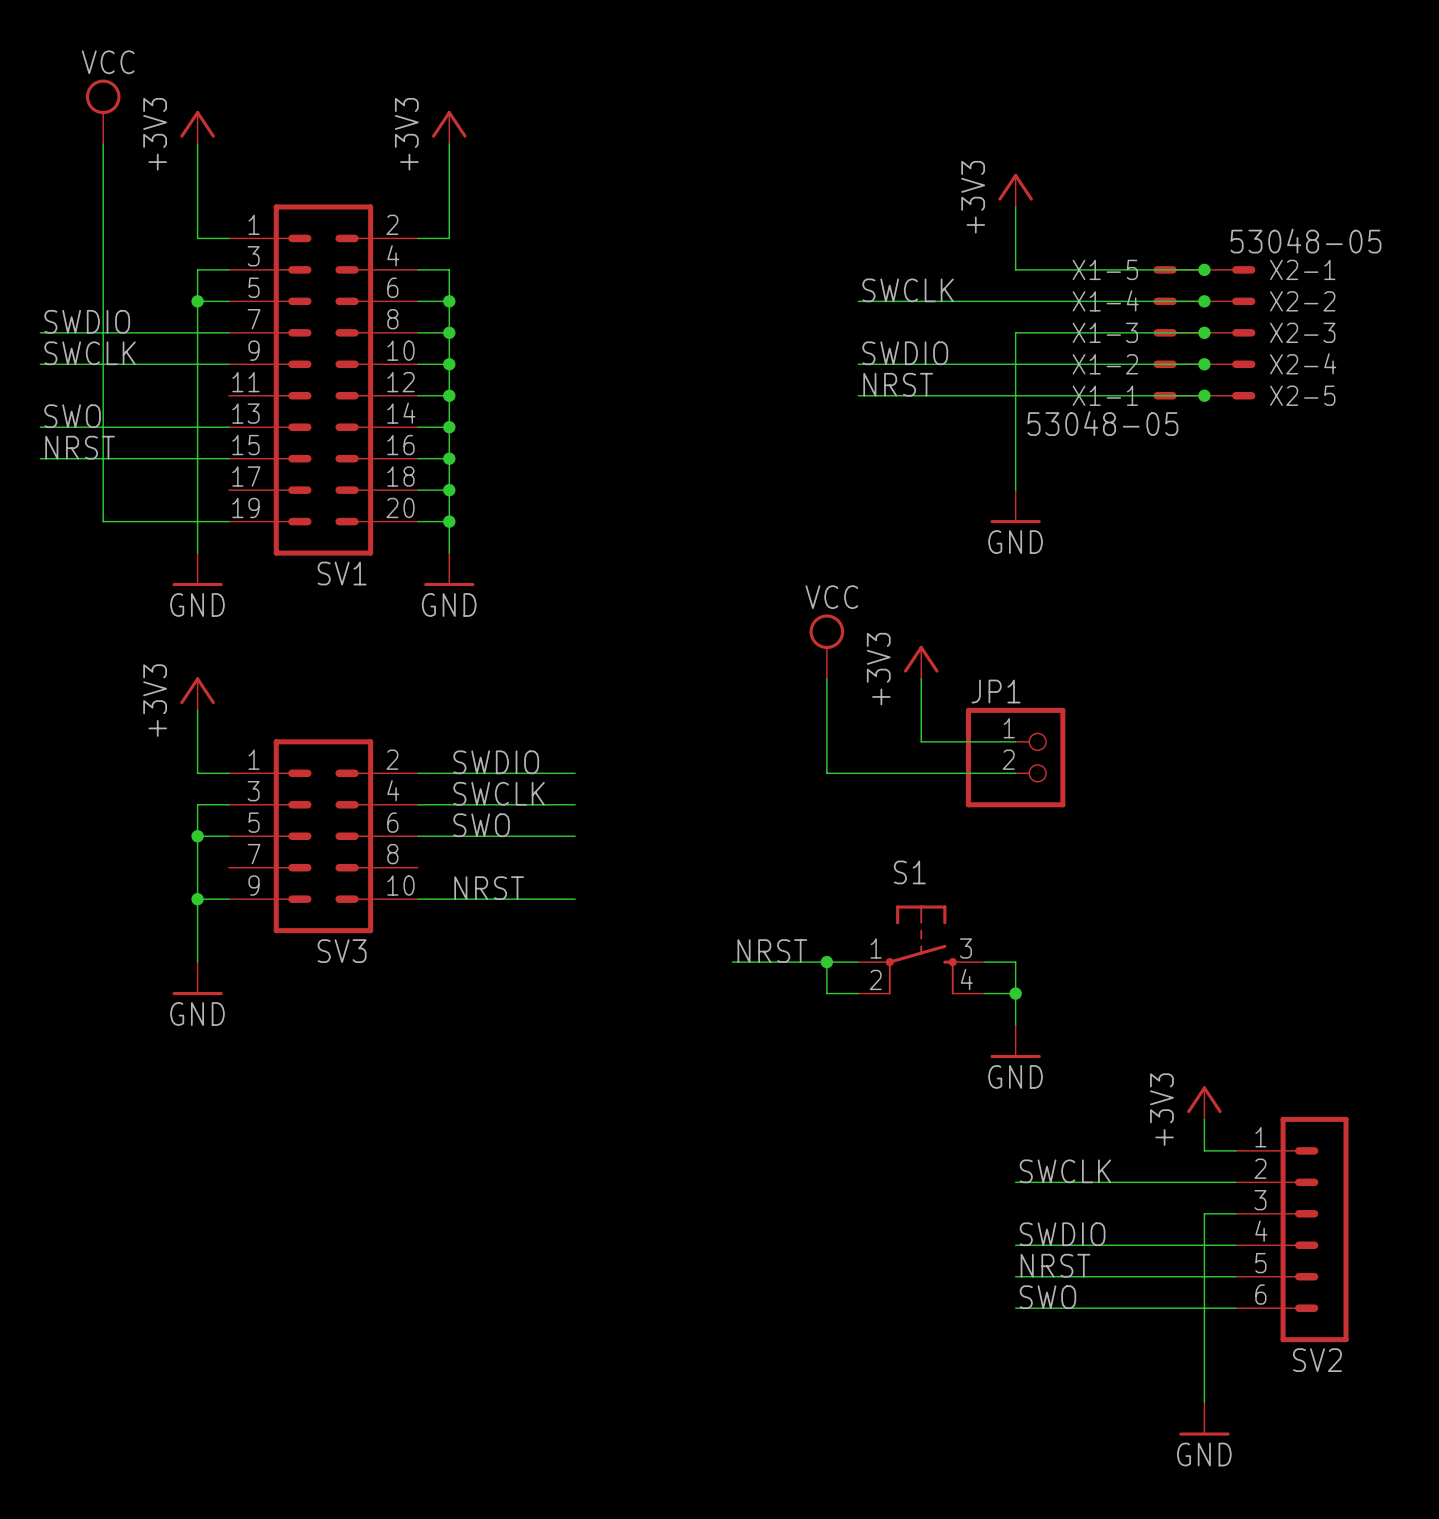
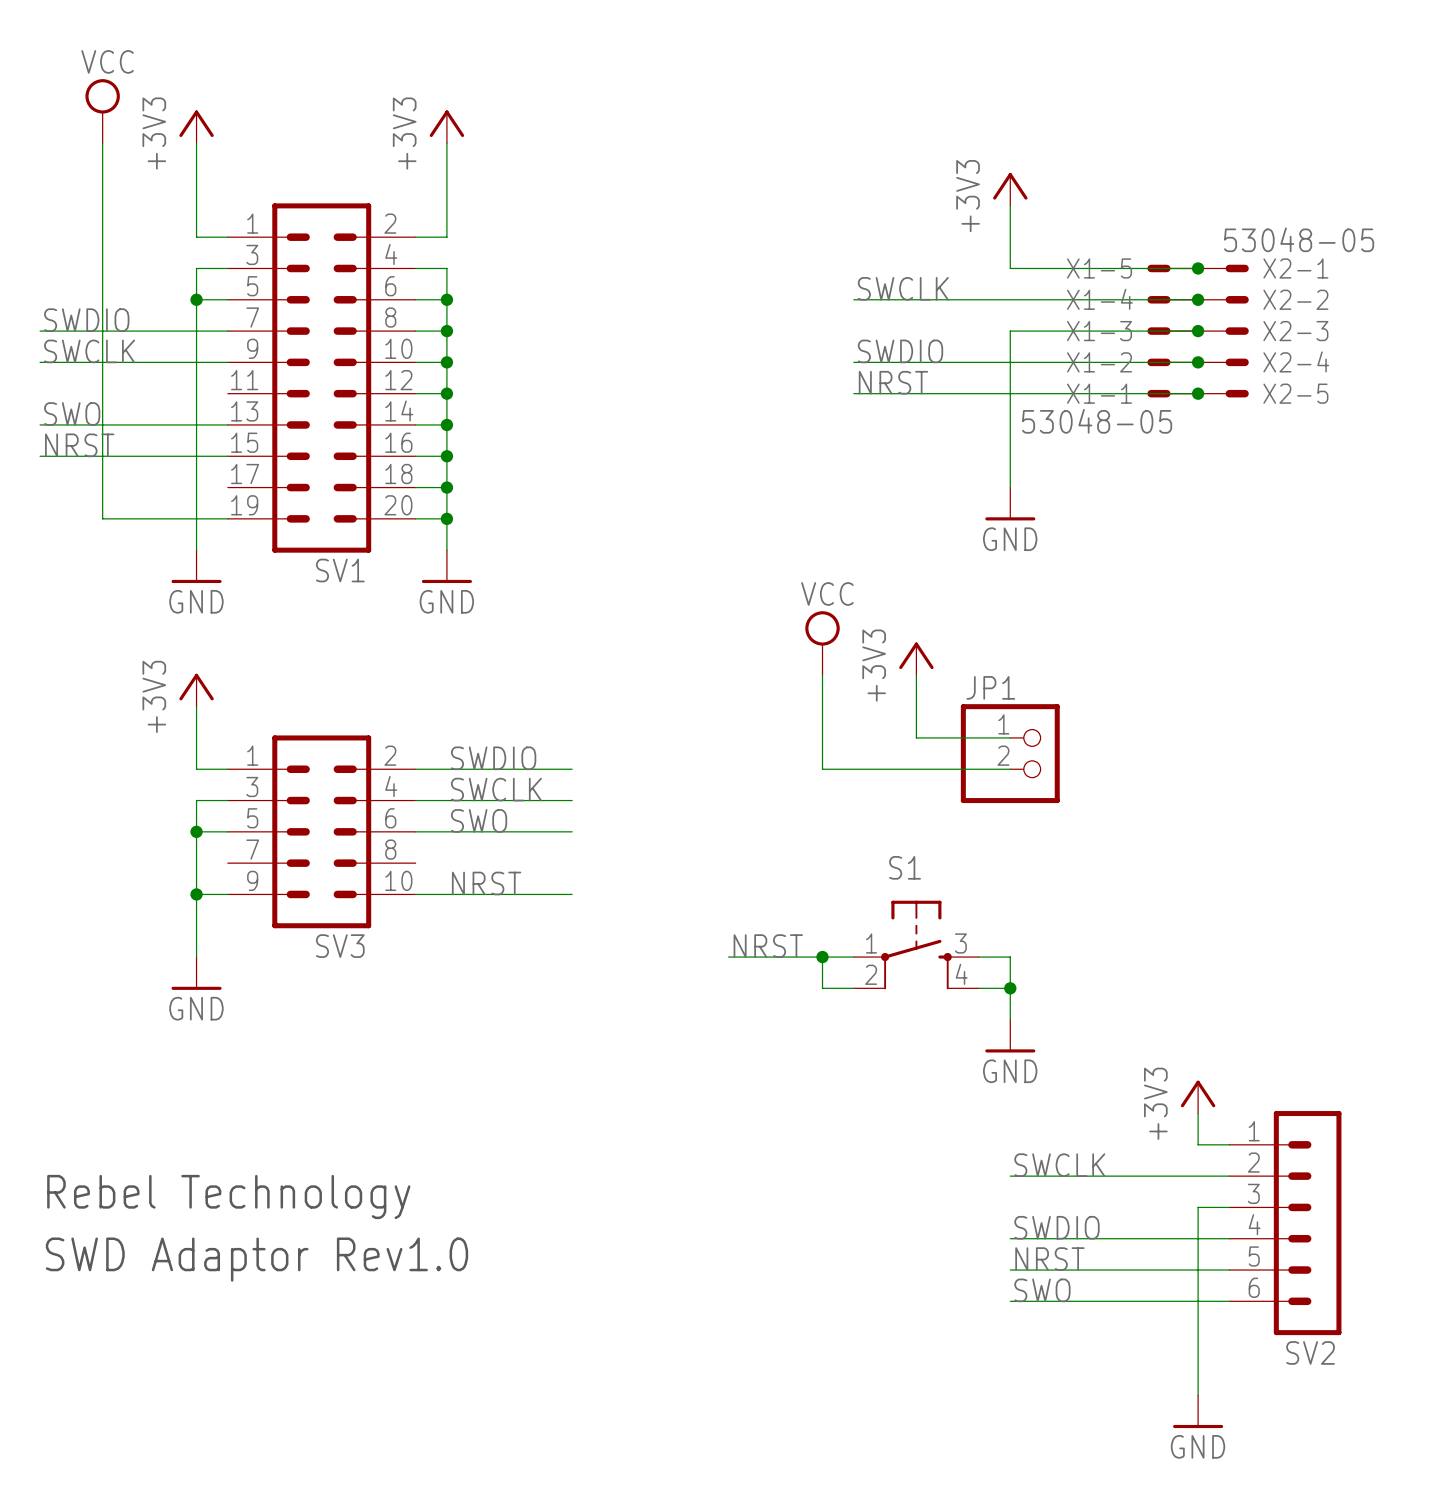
text: none -> Rebel Technology (228, 1196)
text: none -> SWD Adaptor Rev1.0 (256, 1259)

